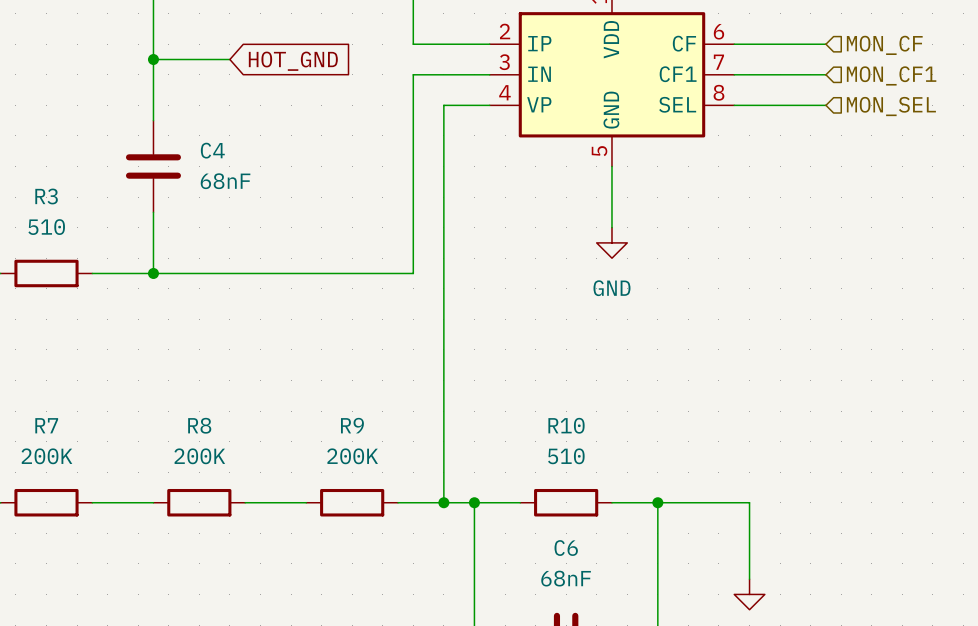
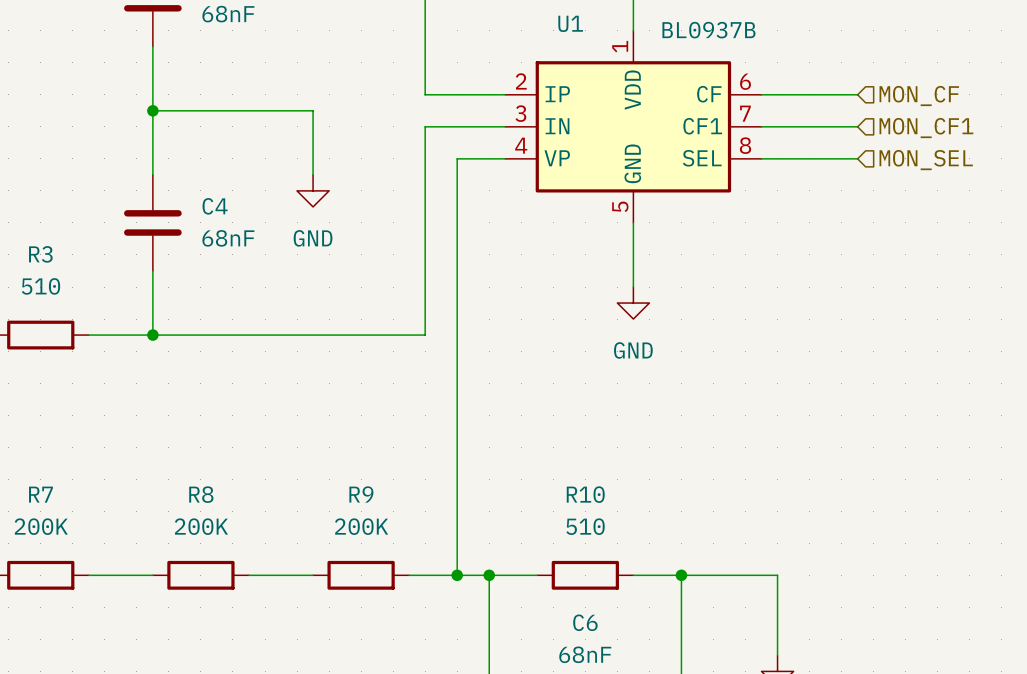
wire: none -> (232, 110) (313, 110) (313, 174)
global label: HOT_GND (293, 61) -> none
power symbol: none -> GND (313, 190)

